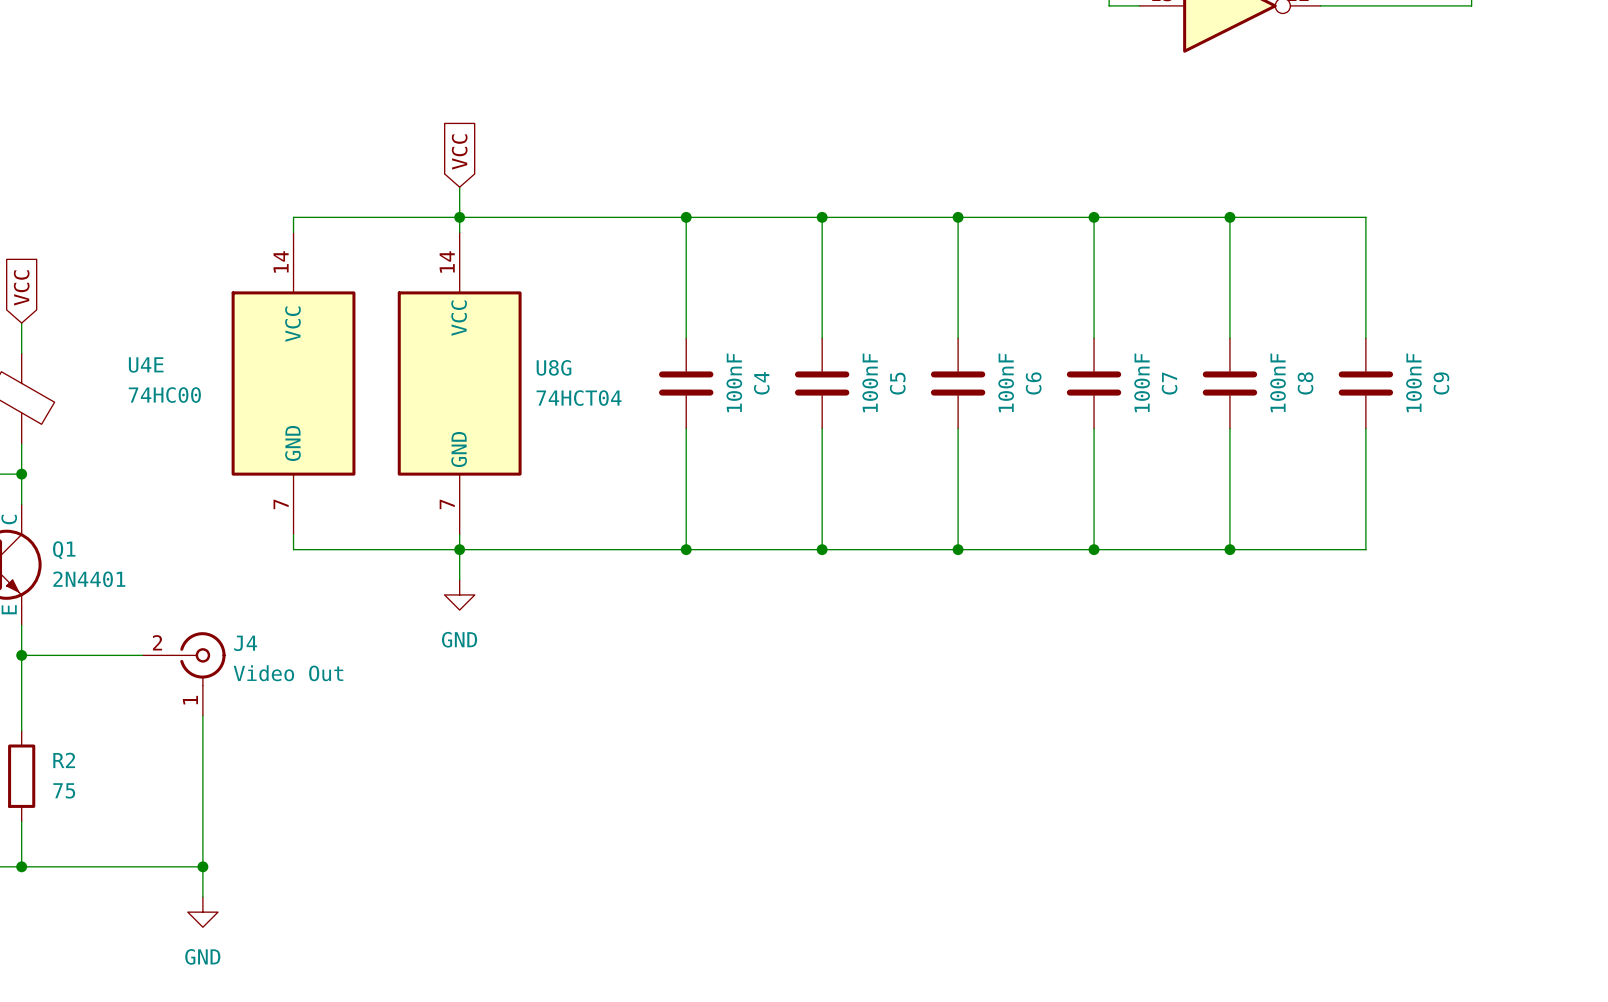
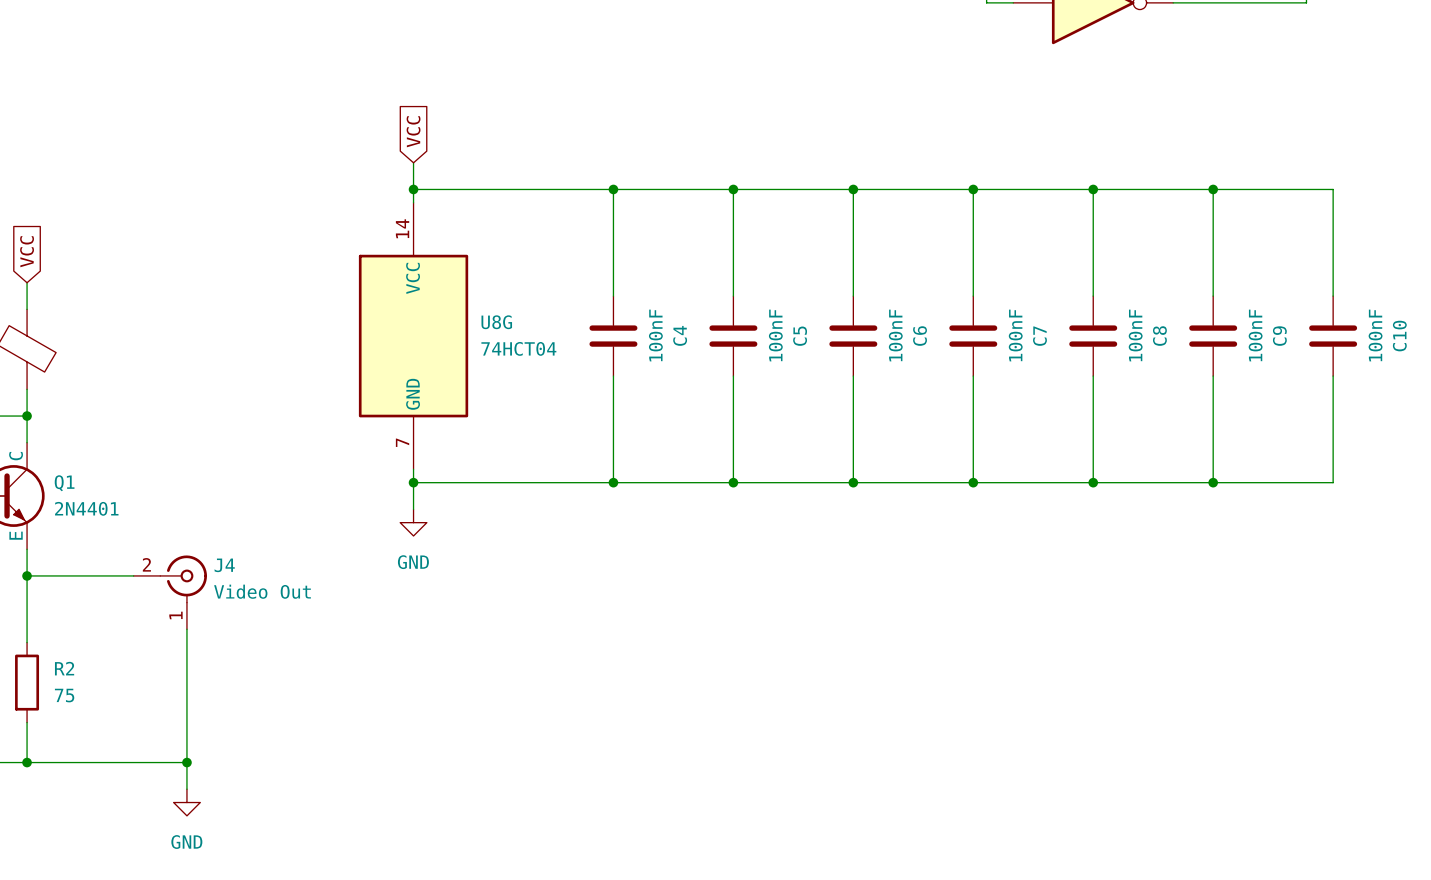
wire: (459, 217) (293, 217) (293, 232) -> none
wire: none -> (1213, 189) (1333, 189) (1333, 296)
junction: none -> (1213, 189)
U4E: 74HC00 (293, 383) -> none
C10: none -> 100nF (1333, 336)
wire: none -> (1333, 376) (1333, 482) (1213, 482)
wire: (293, 534) (293, 549) (459, 549) -> none
junction: none -> (1213, 482)

